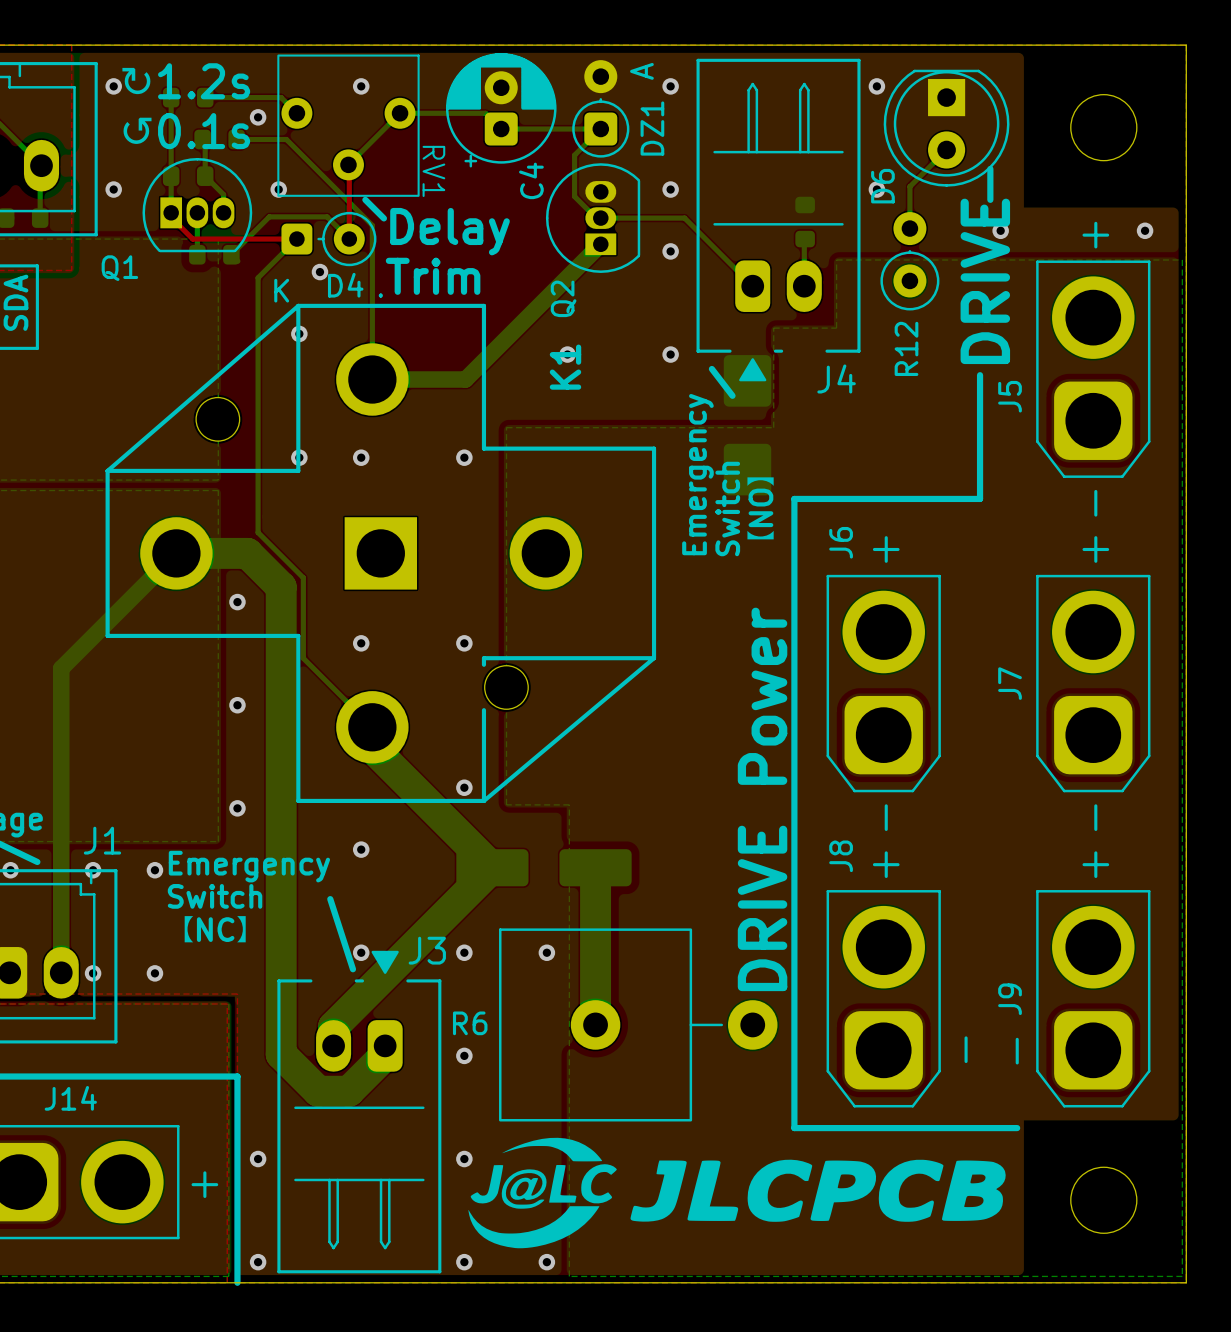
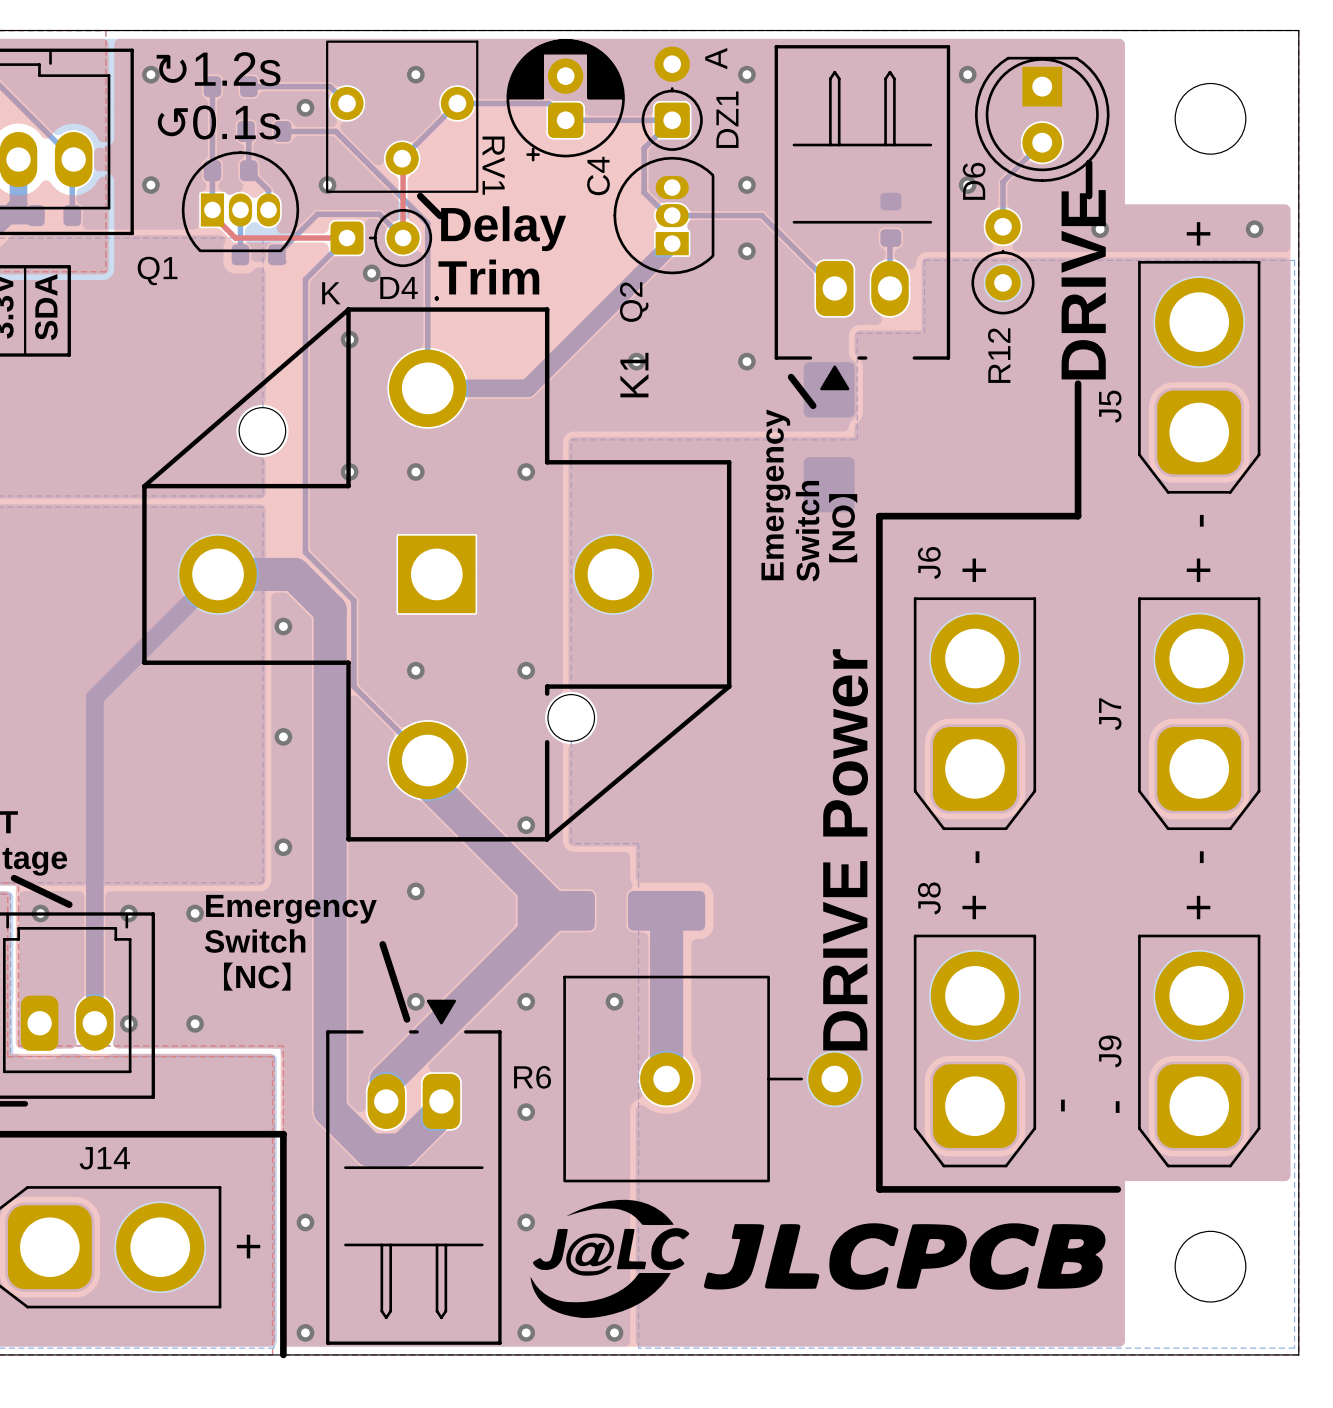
J4 name: J4 (836, 378) -> none
J1 name: J1 (102, 840) -> none
J3 name: J3 (427, 950) -> none

